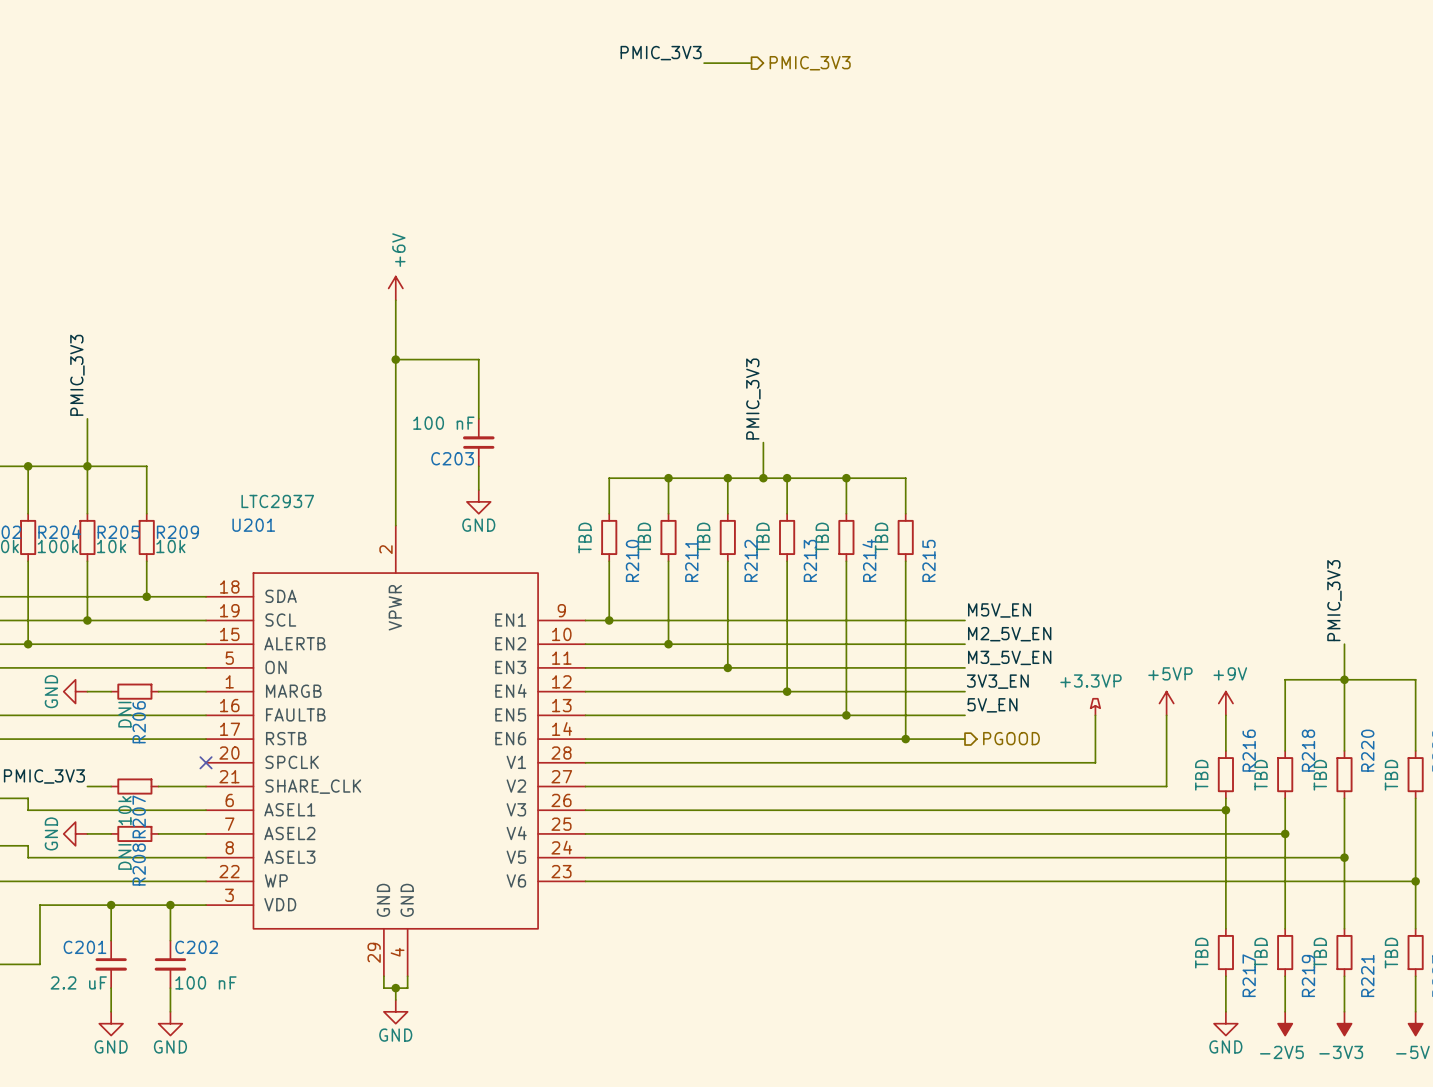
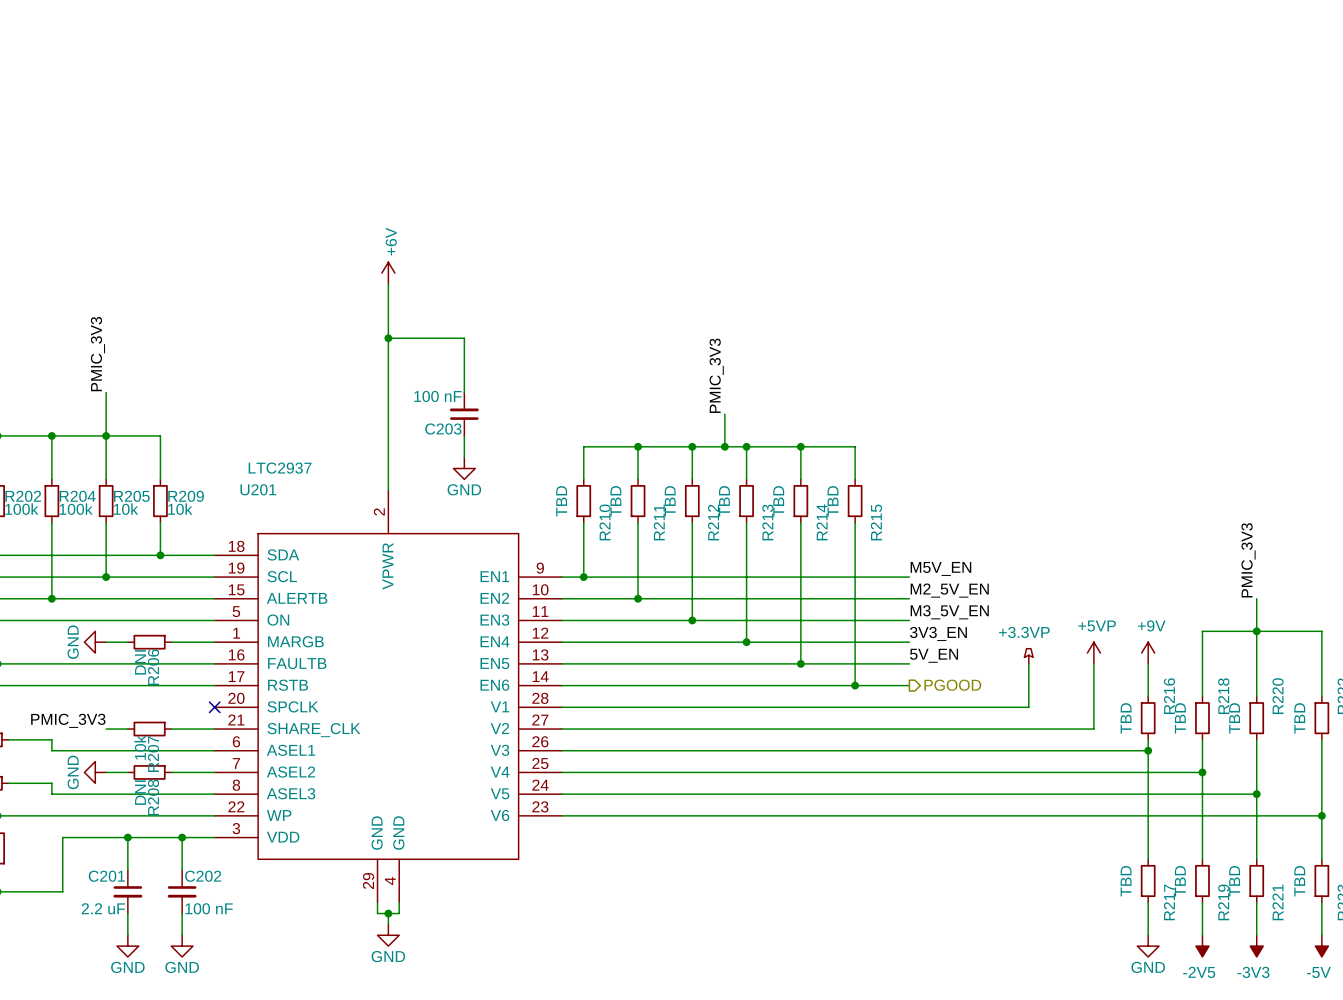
label: PMIC_3V3 (661, 53) -> none
wire: (704, 63) (751, 63) -> none
hierarchical label: PMIC_3V3 (810, 63) -> none

